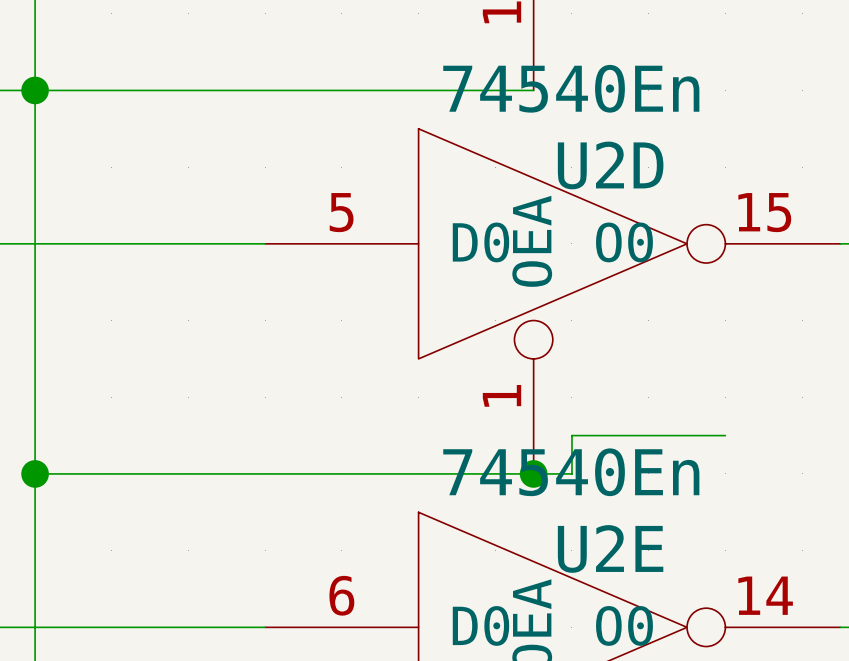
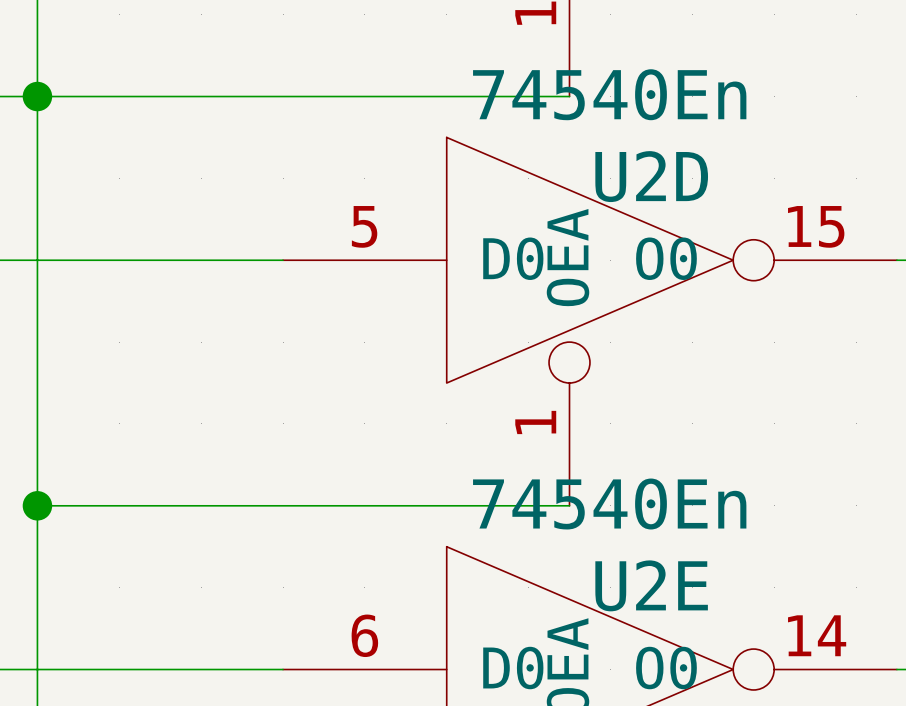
wire: (725, 435) (571, 435) (571, 473) (533, 473) -> none
junction: (533, 473) -> none

